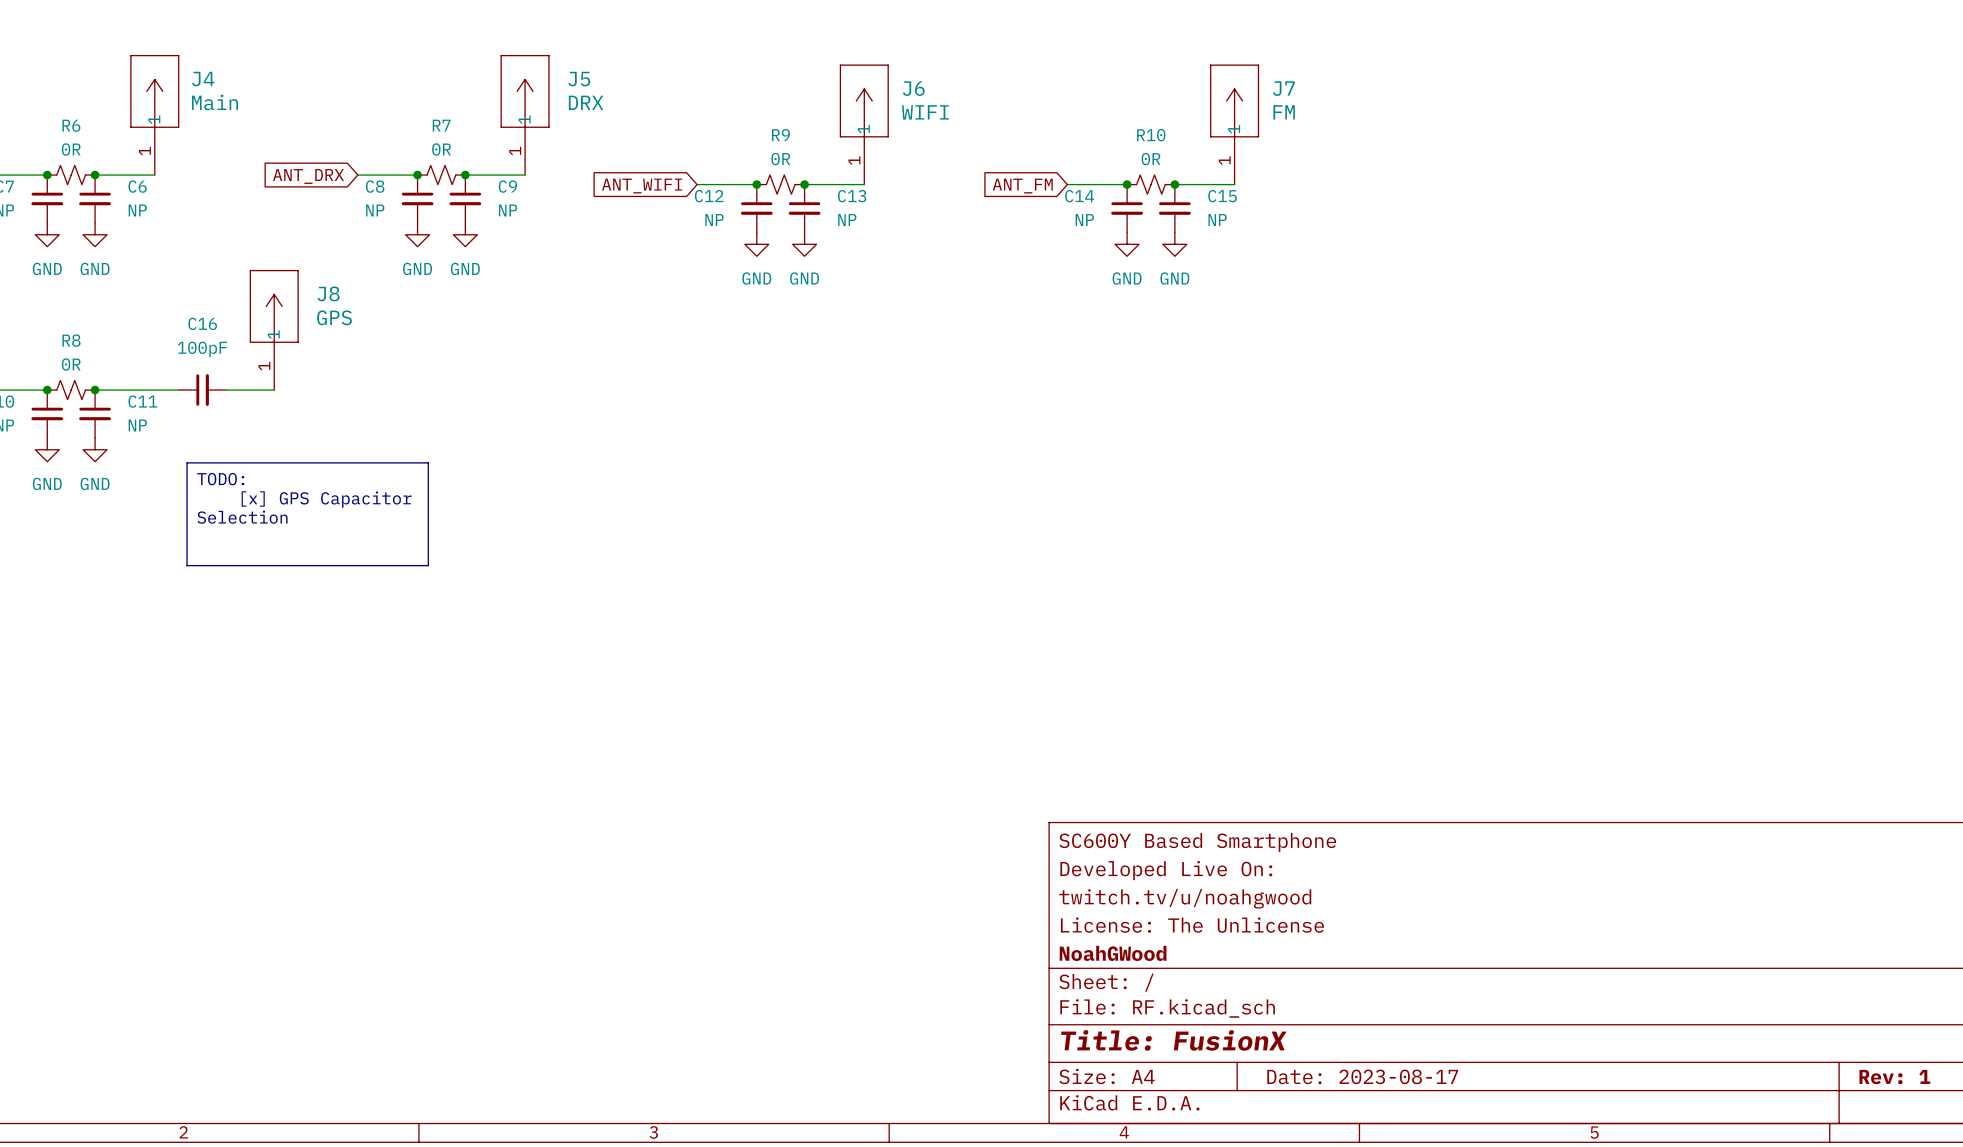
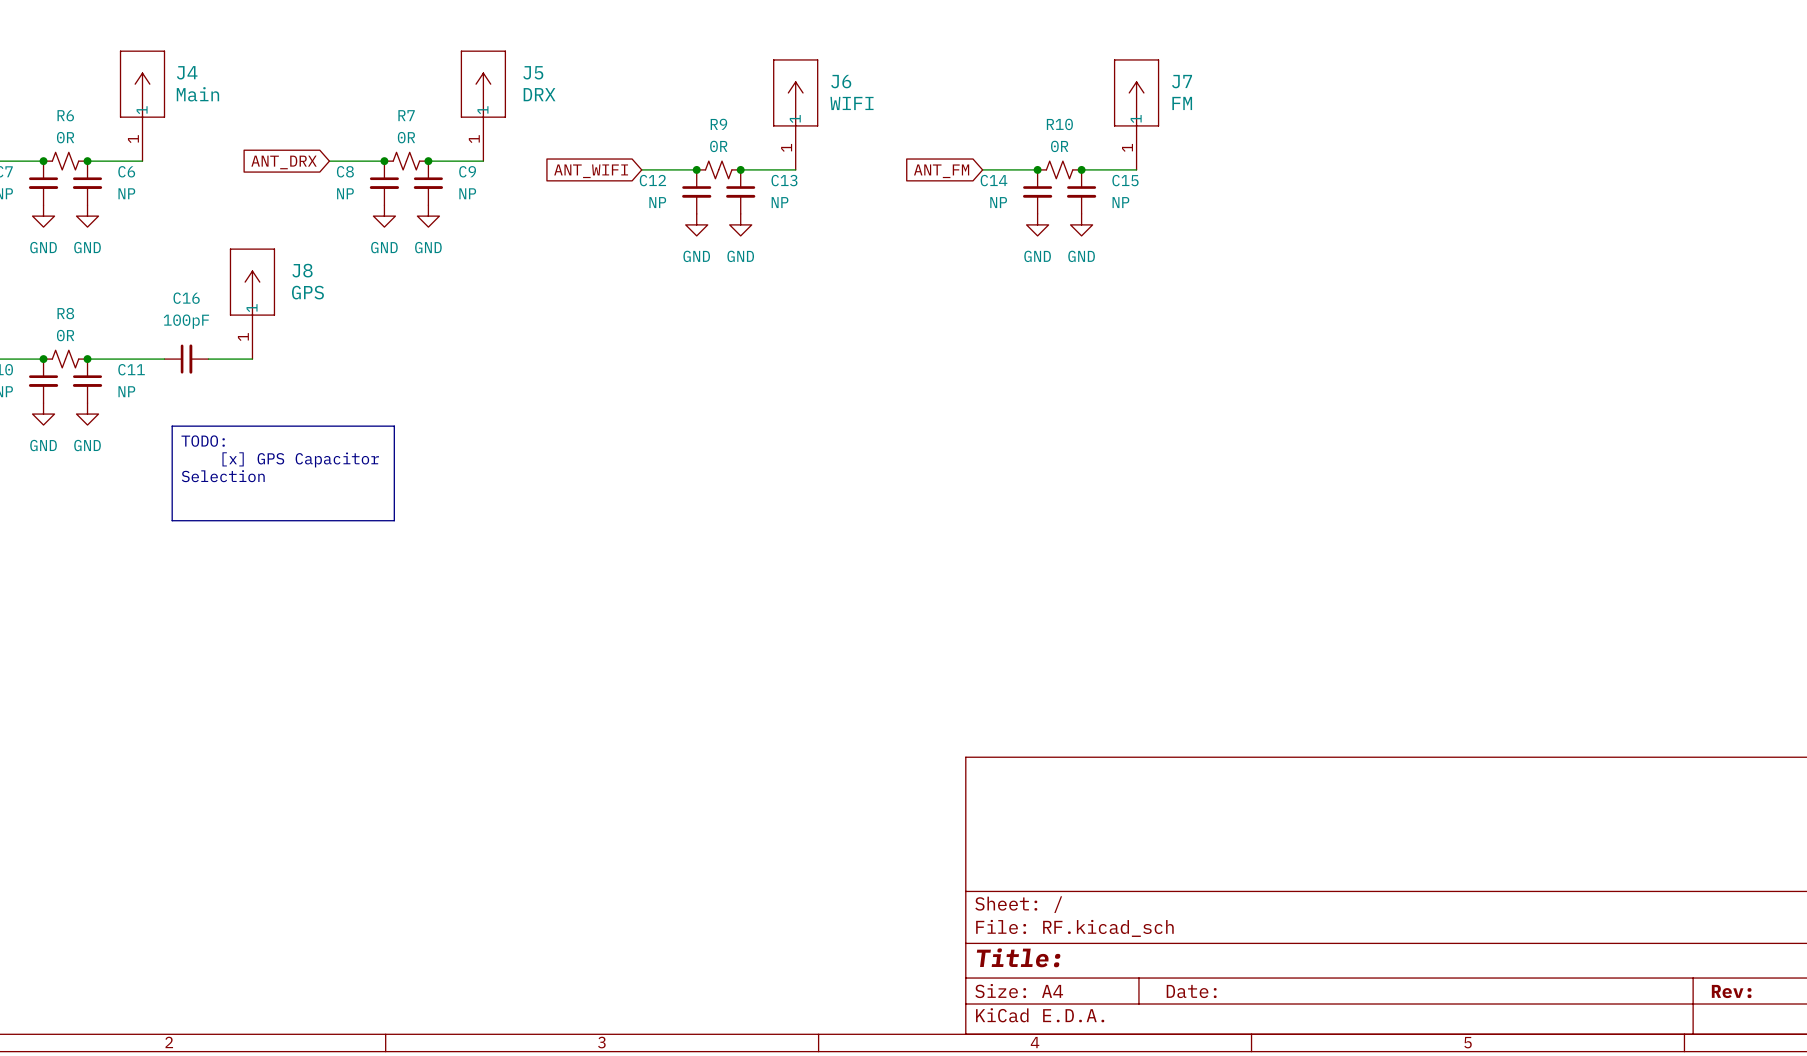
title block: SC600Y Based Smartphone (1197, 842) -> none
title block: Developed Live On: (1166, 870) -> none
title block: twitch.tv/u/noahgwood (1185, 898) -> none
title block: License: The Unlicense (1192, 925) -> none
title block: NoahGWood (1113, 953) -> none
title block: Title: FusionX (1173, 1040) -> Title: (1018, 957)
title block: Date: 2023-08-17 (1362, 1076) -> Date: (1191, 991)
title block: Rev: 1 (1894, 1077) -> Rev: (1731, 991)

